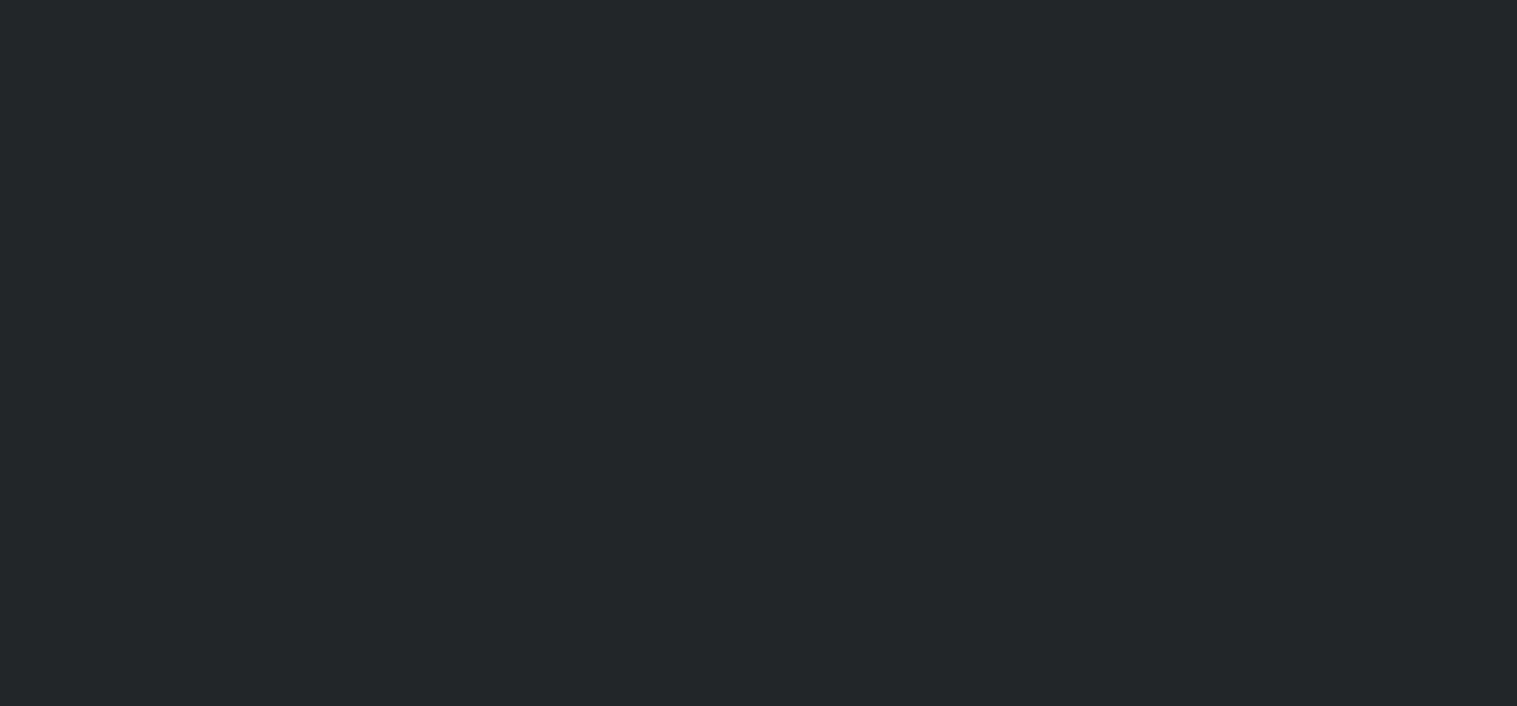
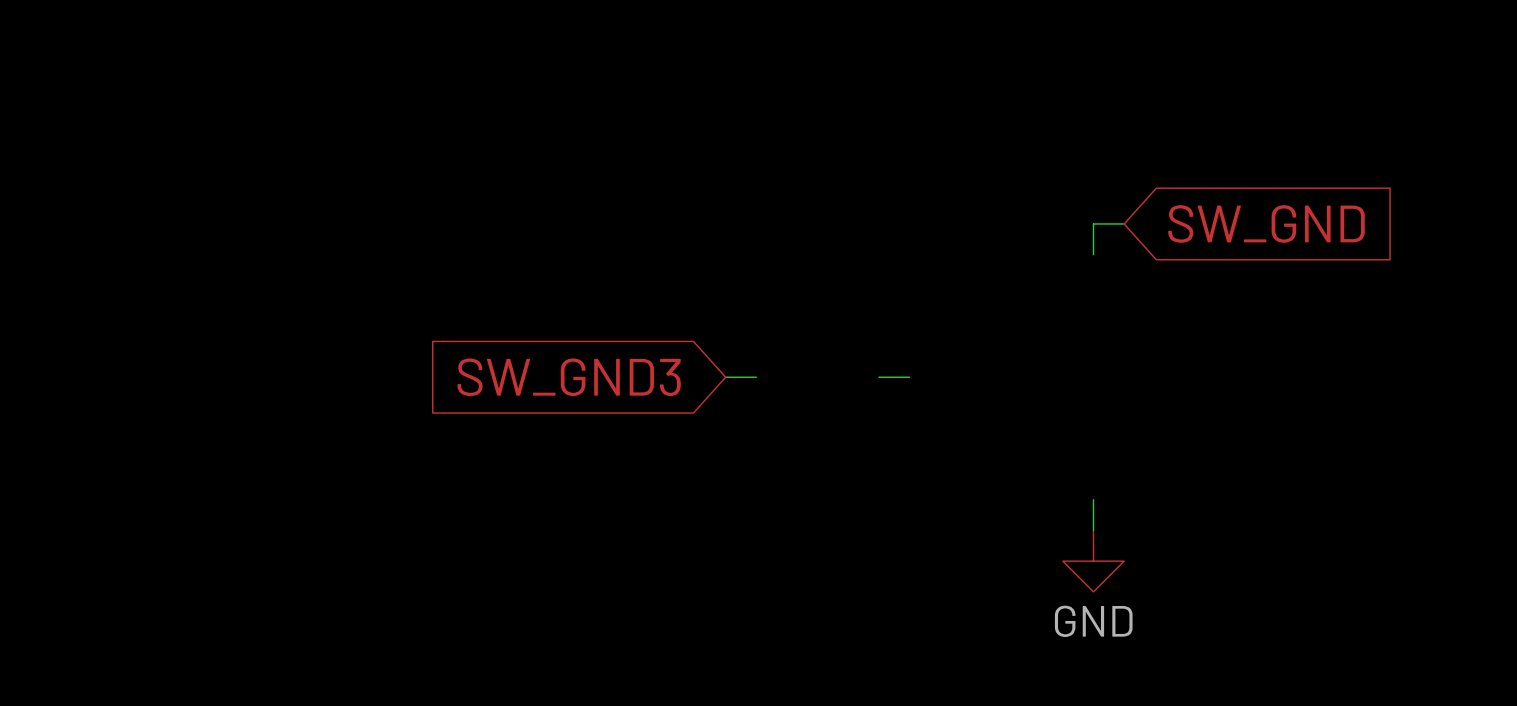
wire: none -> (1124, 223) (1093, 223) (1093, 254)
global label: none -> SW_GND (1266, 223)
wire: none -> (725, 377) (756, 377)
wire: none -> (878, 377) (909, 377)
global label: none -> SW_GND3 (569, 377)
wire: none -> (1093, 499) (1093, 530)
power symbol: none -> GND (1093, 561)

